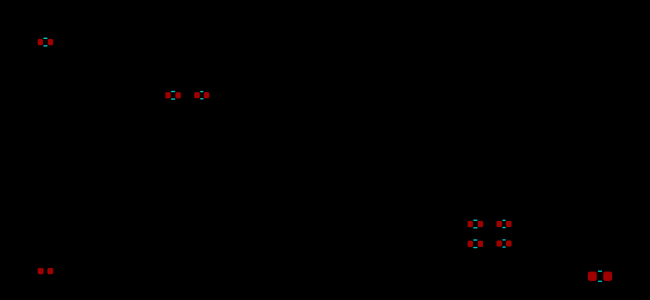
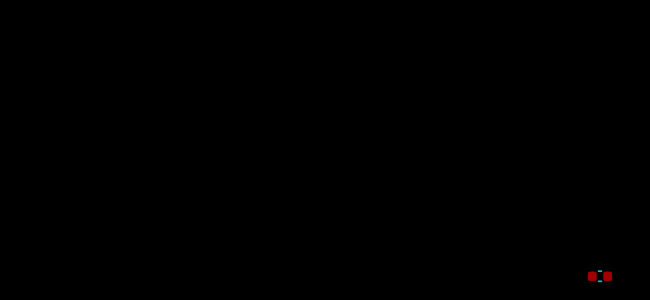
part: (45, 42) -> none
part: (173, 95) -> none
part: (201, 95) -> none
part: (504, 223) -> none
part: (475, 224) -> none
part: (475, 243) -> none
part: (504, 243) -> none
part: (45, 271) -> none

